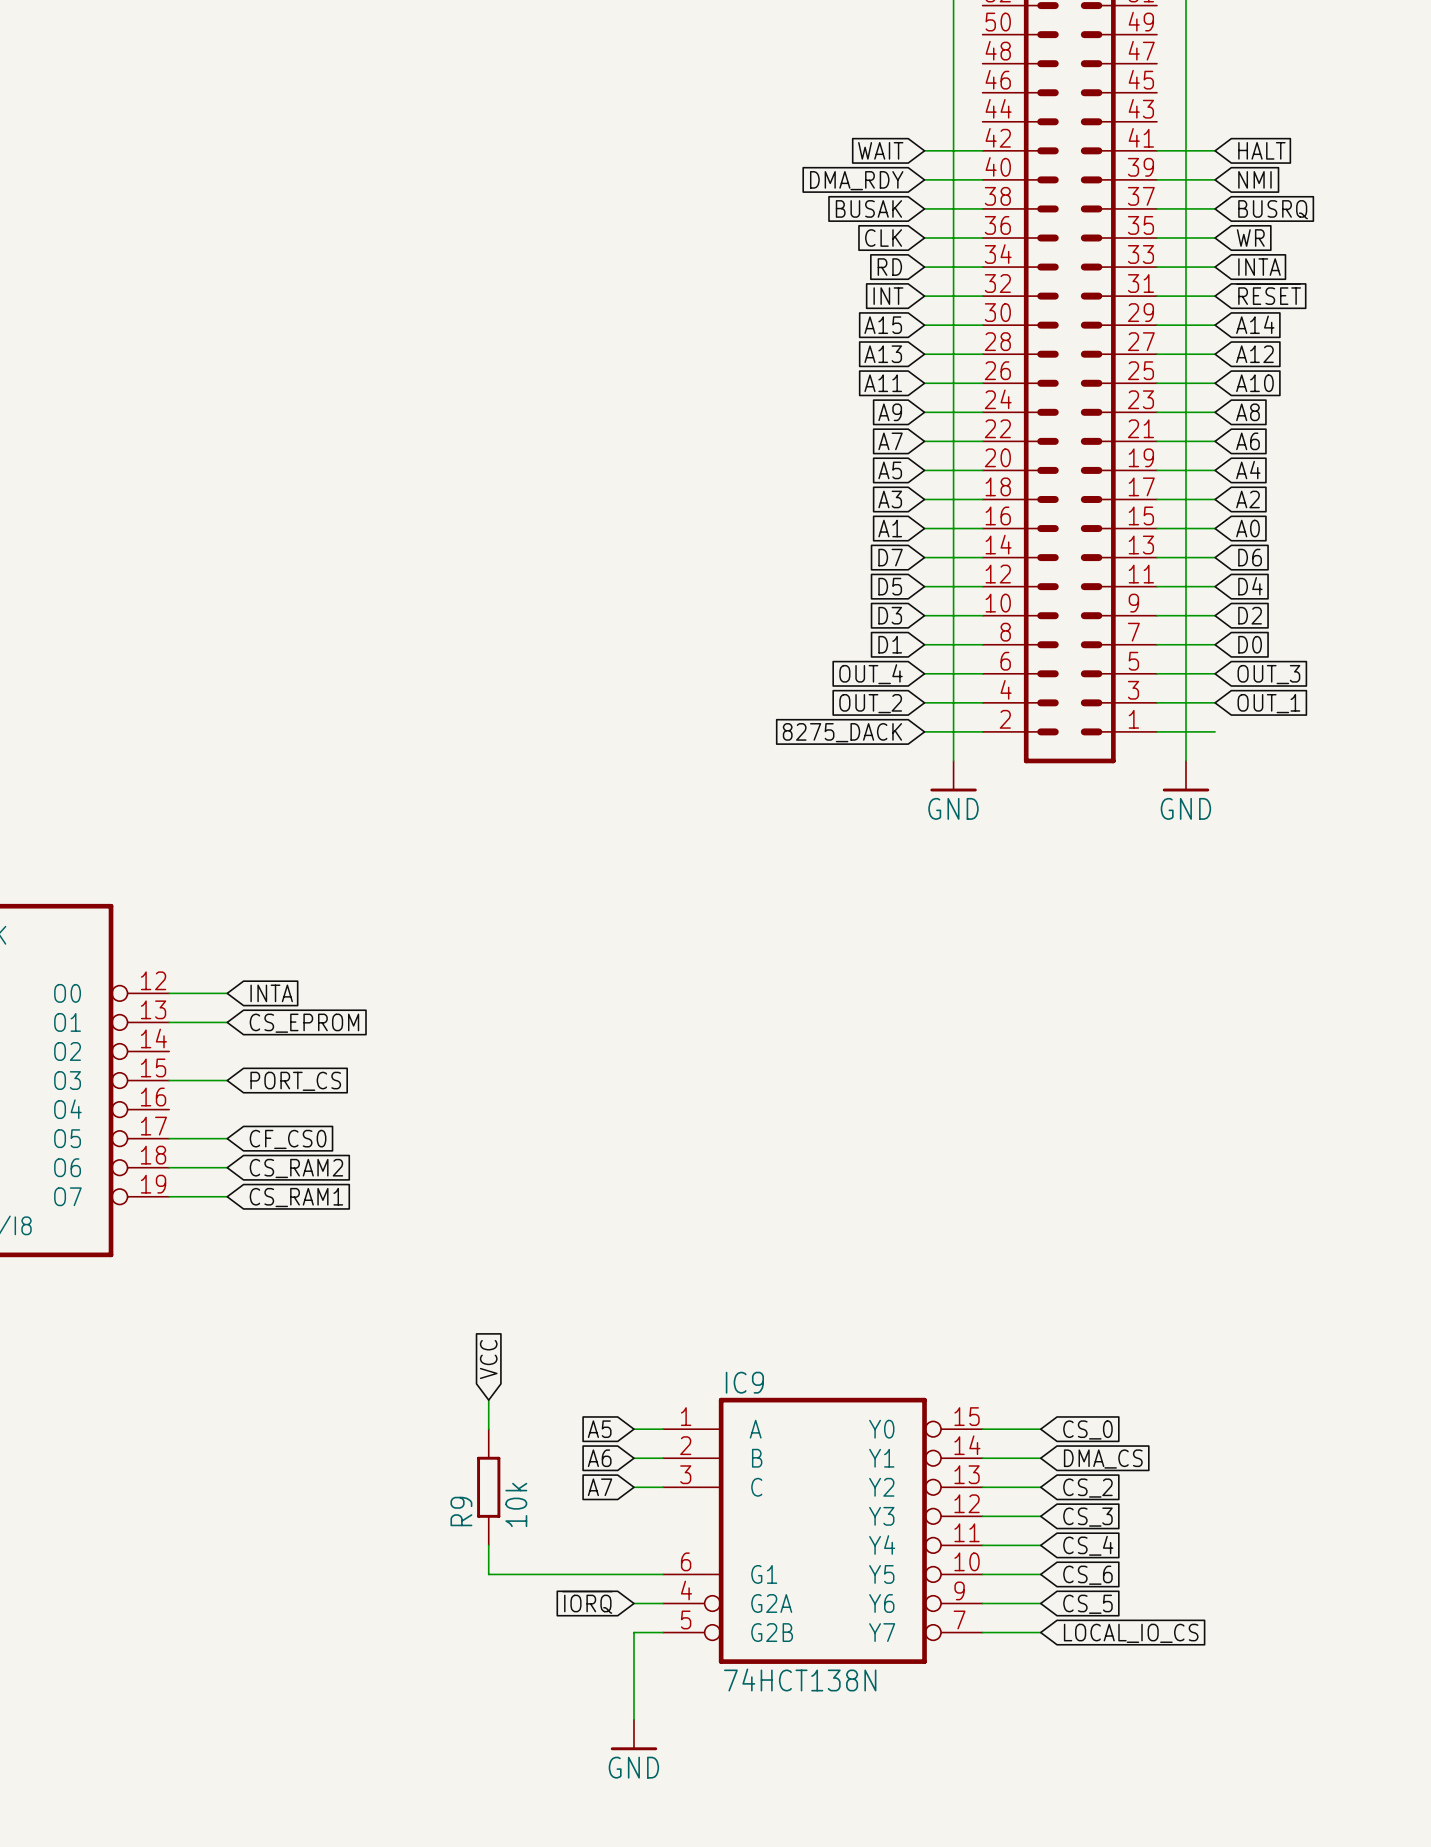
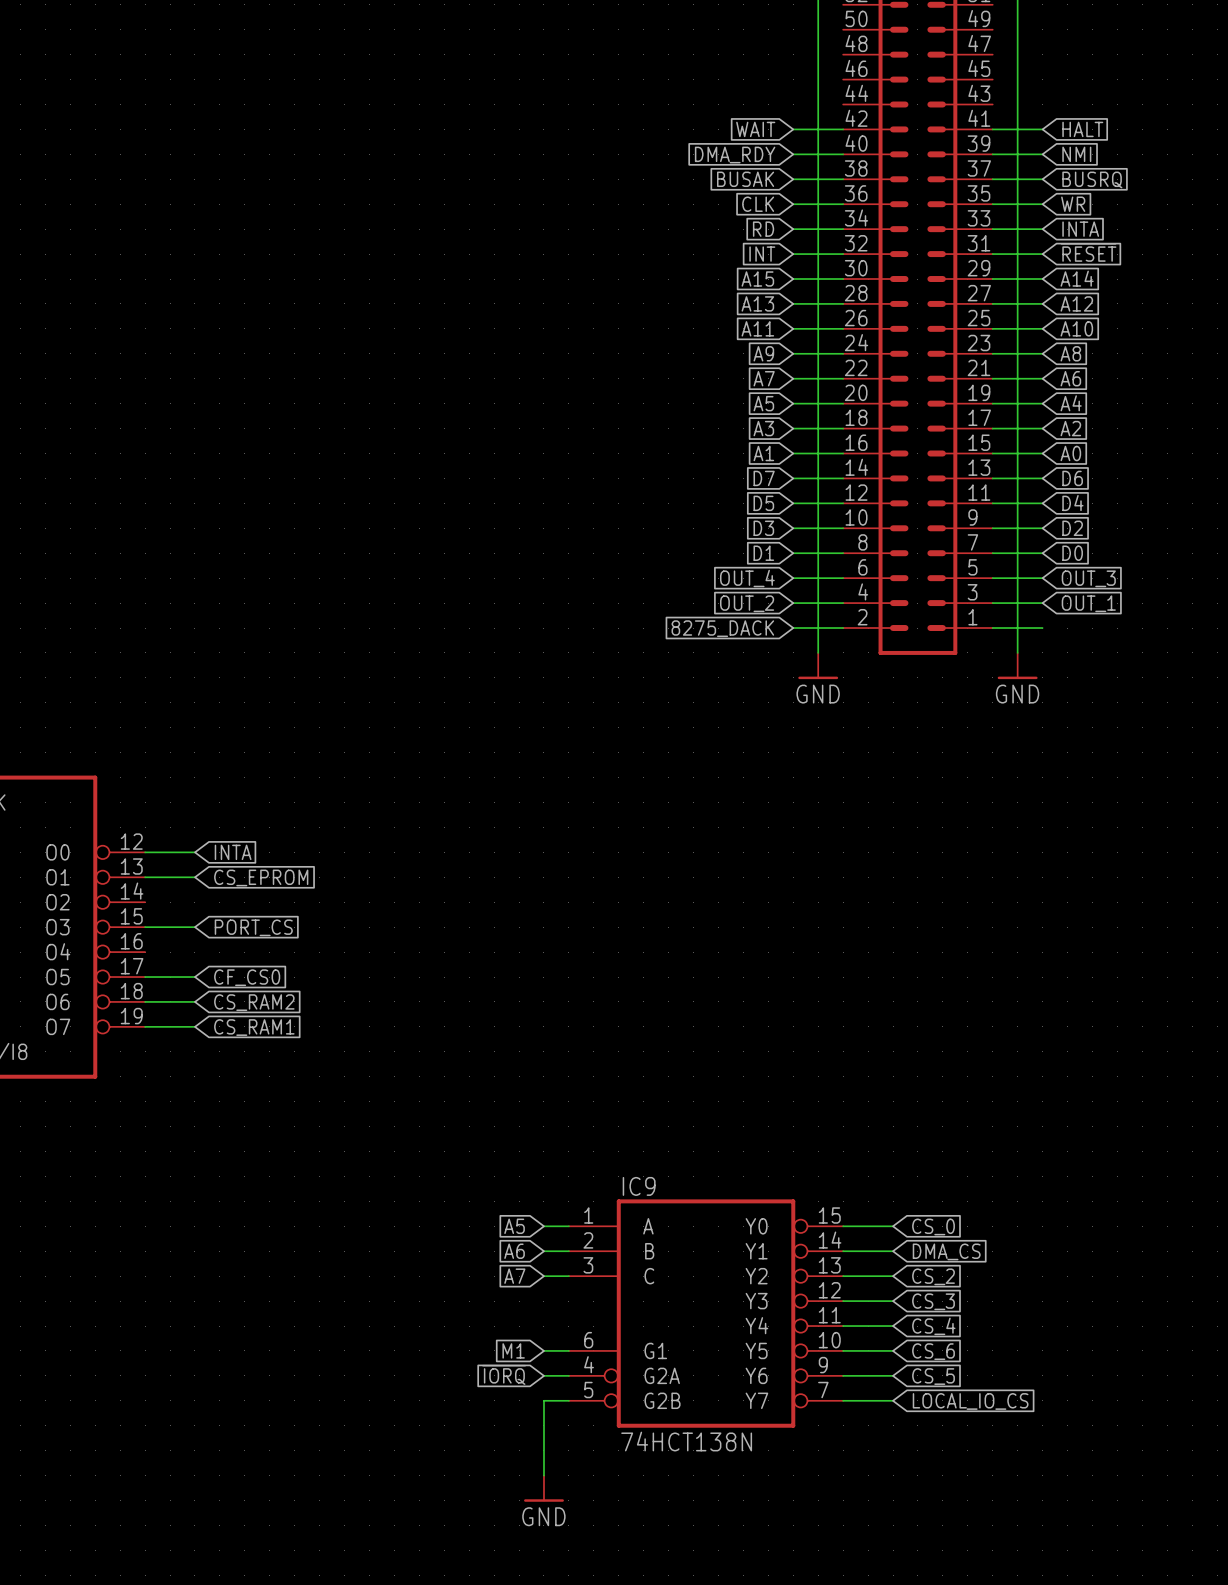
global label: VCC (488, 1359) -> none
wire: (488, 1400) (488, 1429) -> none
R9: 10k (488, 1487) -> none
wire: (488, 1545) (488, 1574) (633, 1574) -> none
global label: none -> M1 (513, 1350)

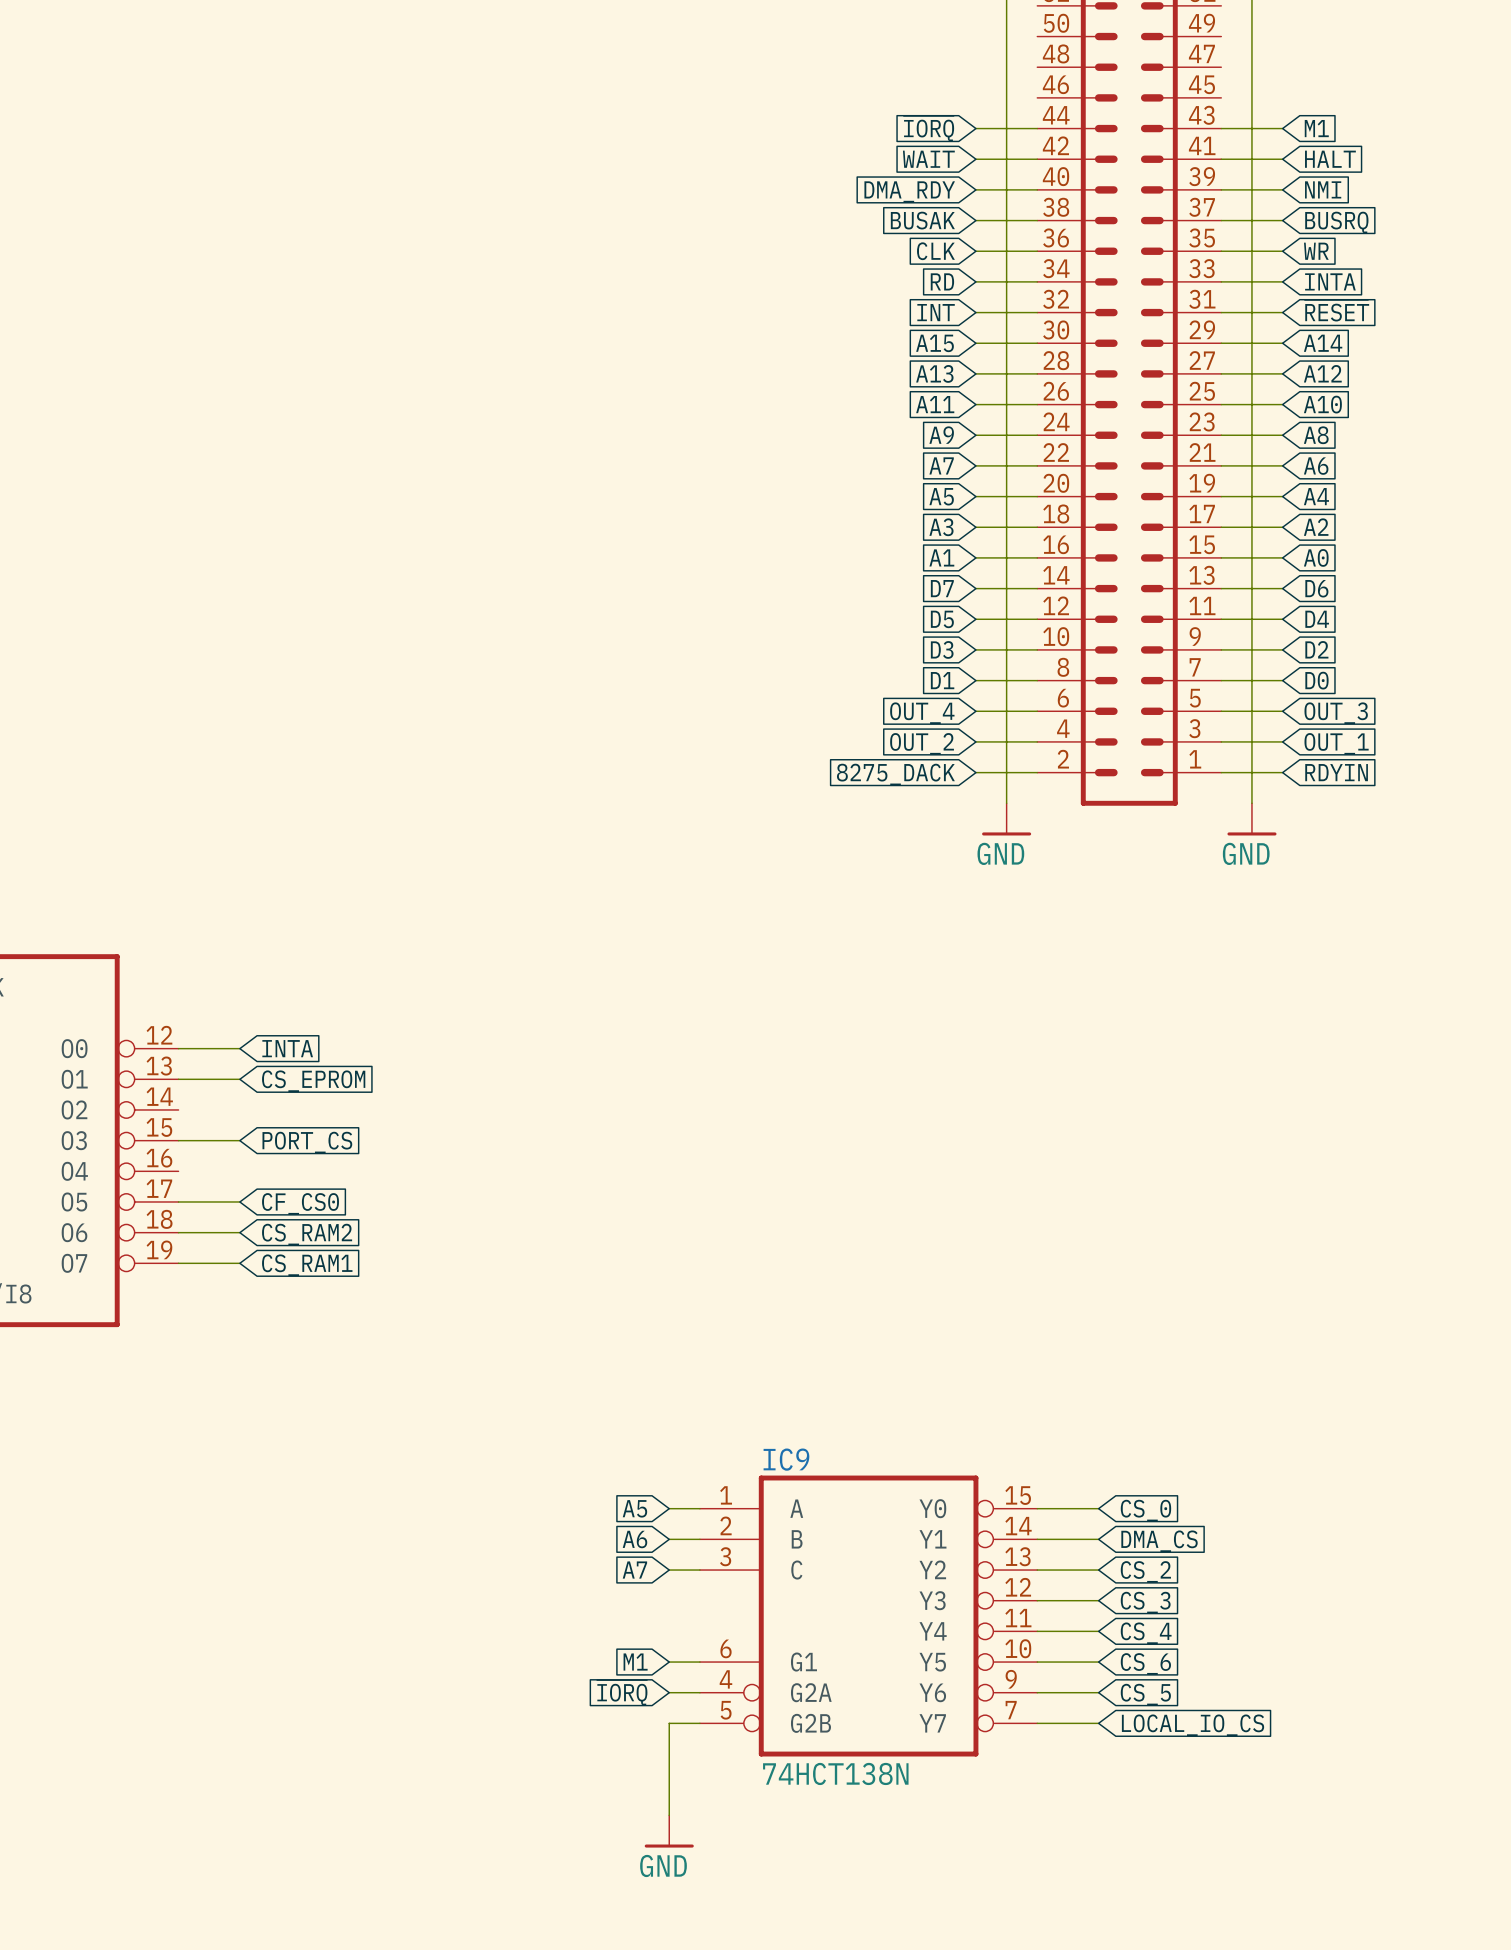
global label: none -> ~{IORQ} (928, 128)
wire: none -> (975, 128) (1037, 128)
wire: none -> (1221, 128) (1282, 128)
global label: none -> M1 (1316, 128)
global label: none -> RDYIN (1336, 772)

